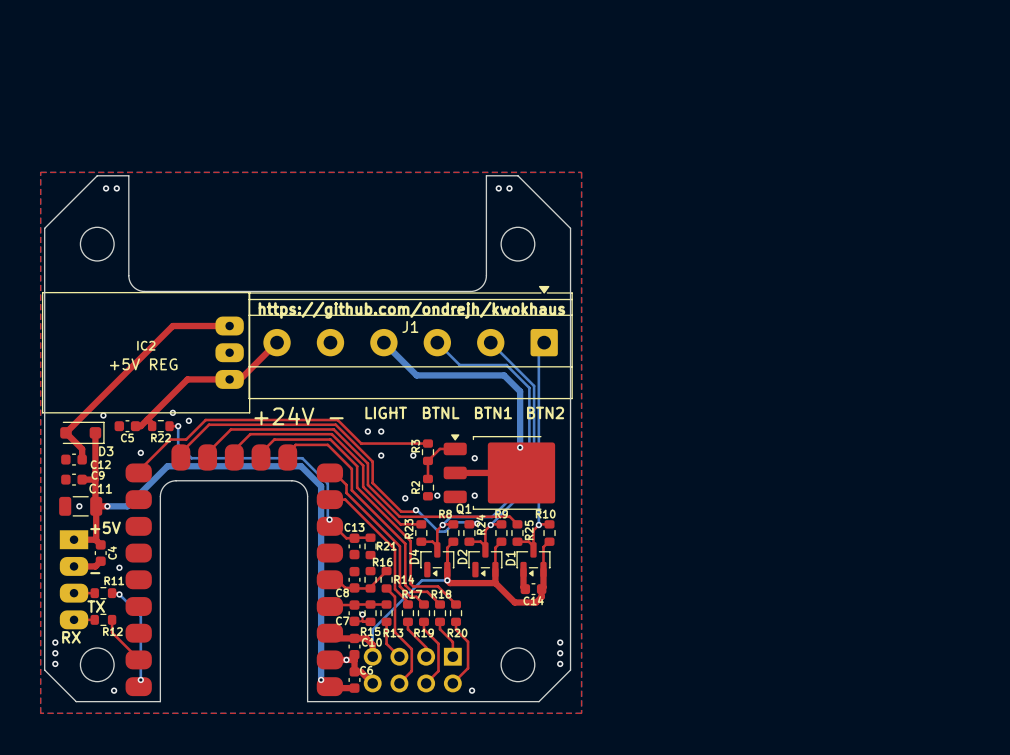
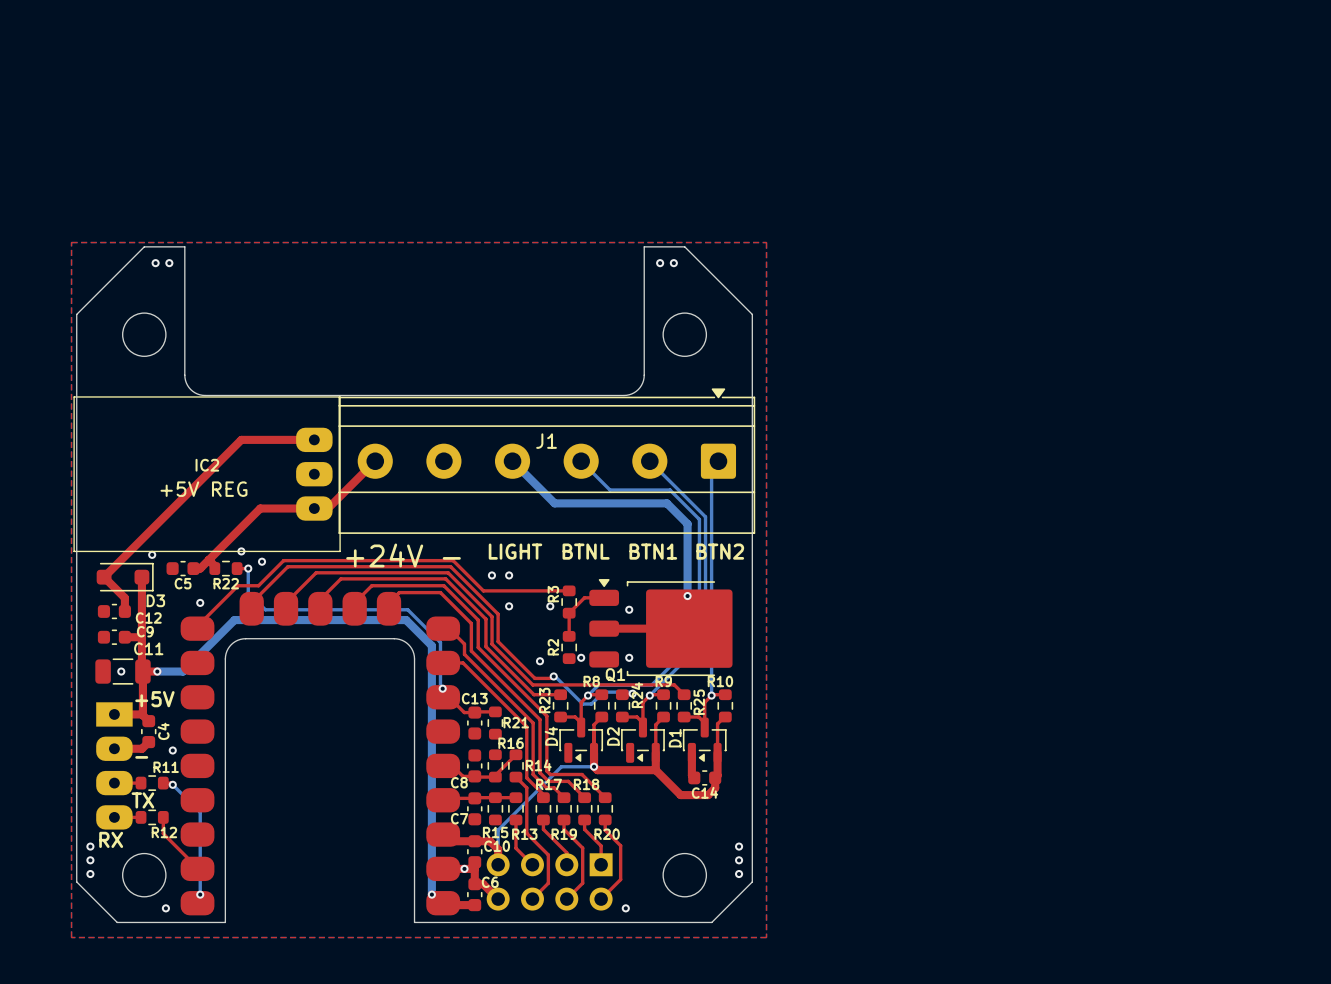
text: https://github.com/ondrejh/kwokhaus (411, 310) -> none
top track: (362, 614) (362, 621) (363, 621) (370, 621) (370, 621) (354, 621) -> none
via: (362, 614) -> none

